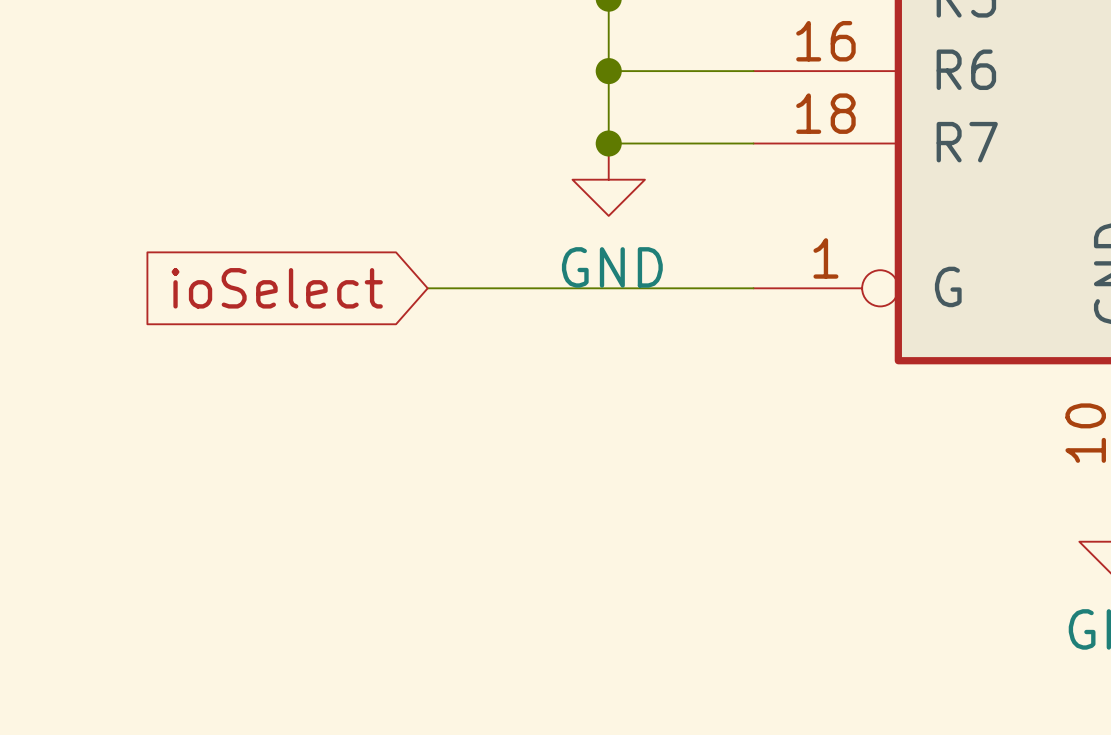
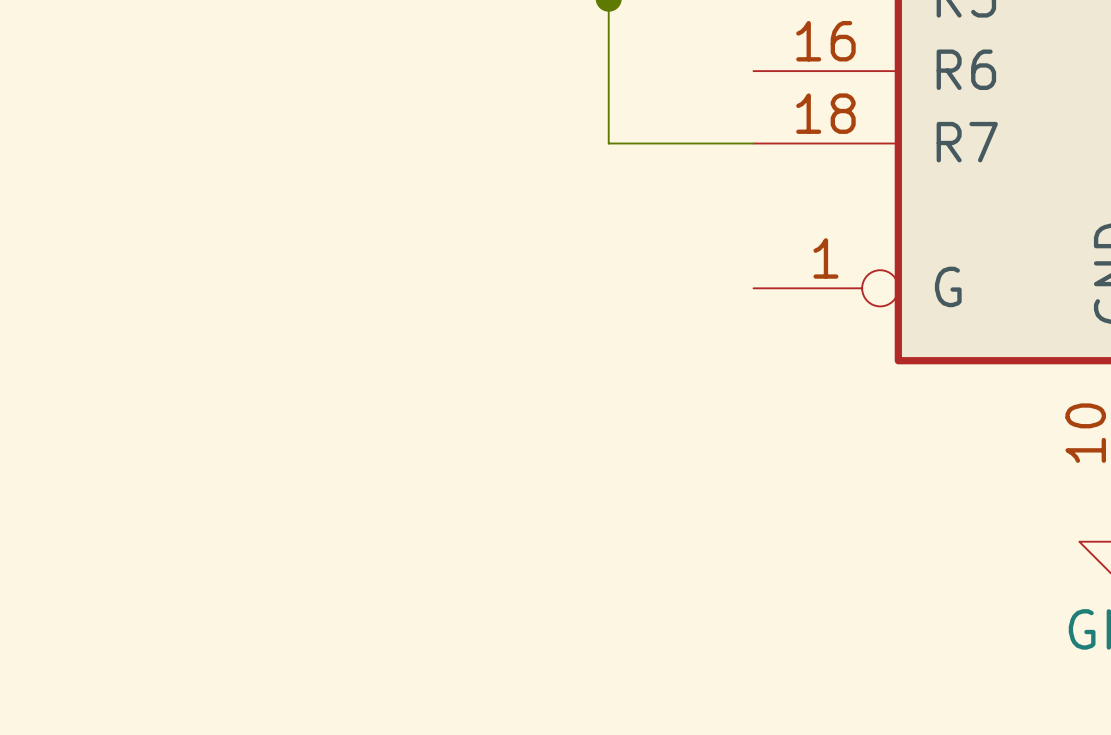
wire: (608, 71) (753, 71) -> none
junction: (608, 71) -> none
junction: (608, 143) -> none
power symbol: GND (608, 179) -> none
global label: ioSelect (277, 288) -> none
wire: (427, 288) (753, 288) -> none

